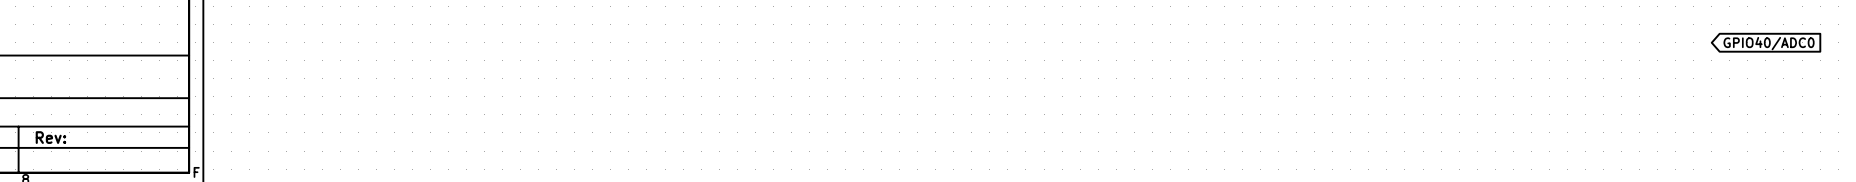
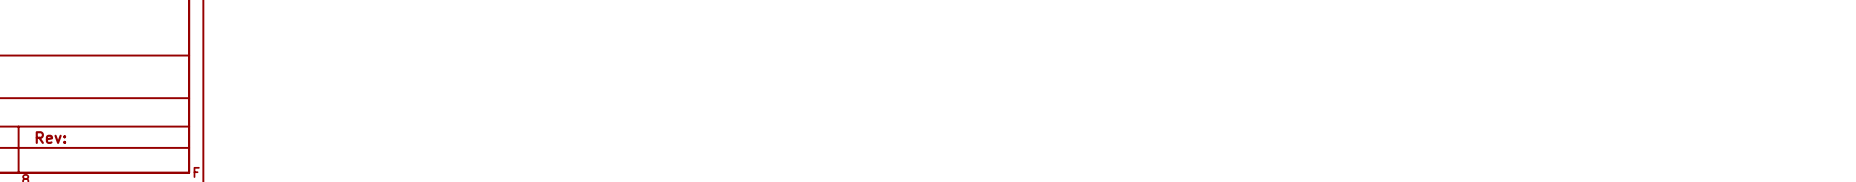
global label: GPIO40/ADC0 (1769, 43) -> none

